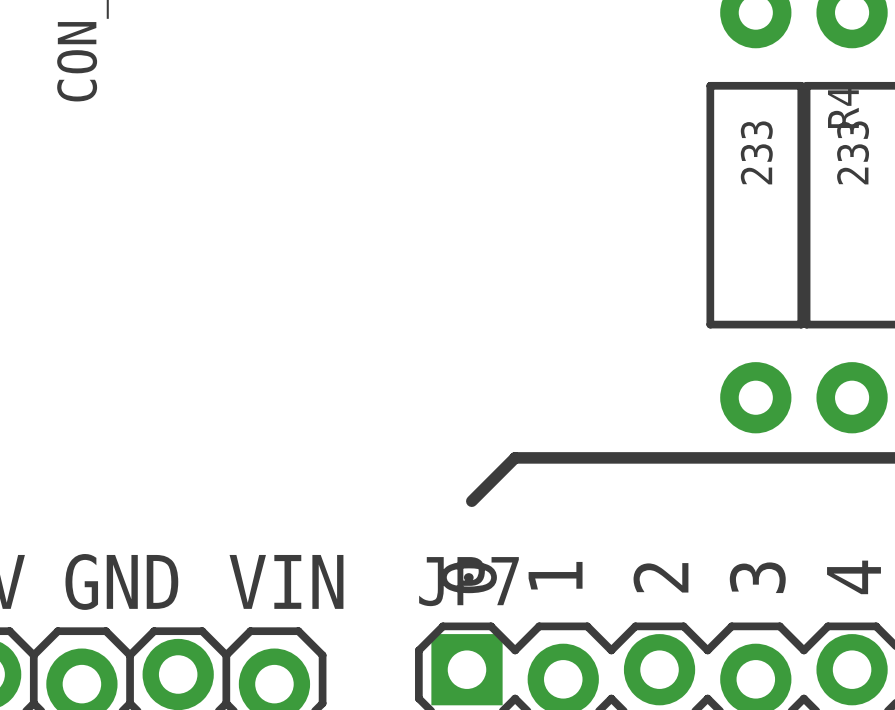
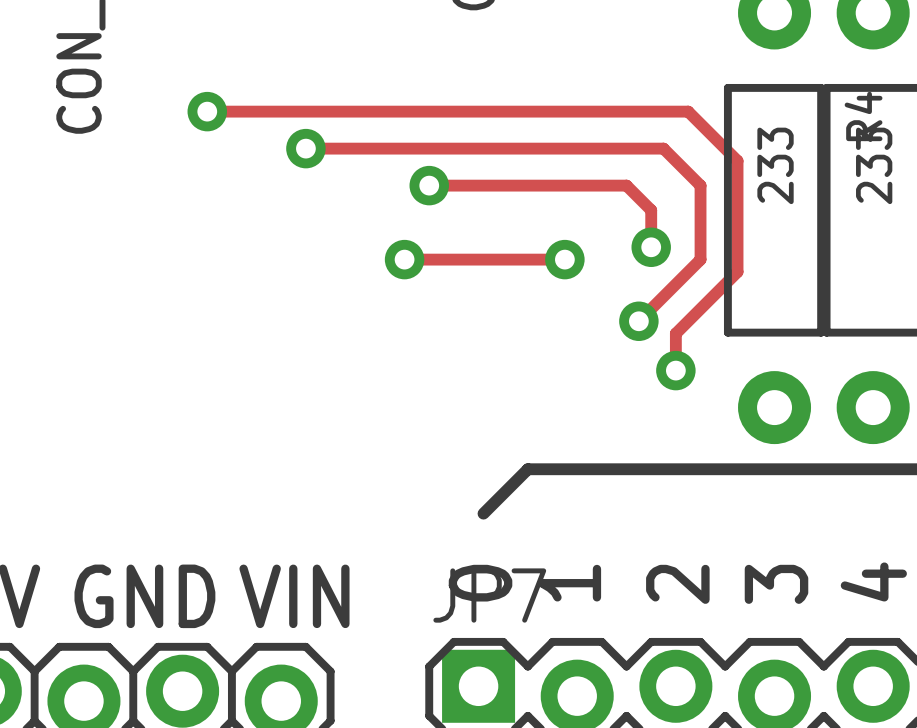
track: none -> (207, 111) (688, 111) (737, 160) (737, 271) (675, 333) (675, 370)
via: none -> (207, 111)
track: none -> (305, 148) (663, 148) (700, 185) (700, 259) (638, 321)
via: none -> (305, 148)
track: none -> (429, 185) (626, 185) (651, 210) (651, 247)
via: none -> (429, 185)
via: none -> (651, 247)
track: none -> (404, 259) (564, 259)
via: none -> (404, 259)
via: none -> (564, 259)
via: none -> (638, 321)
via: none -> (675, 370)

